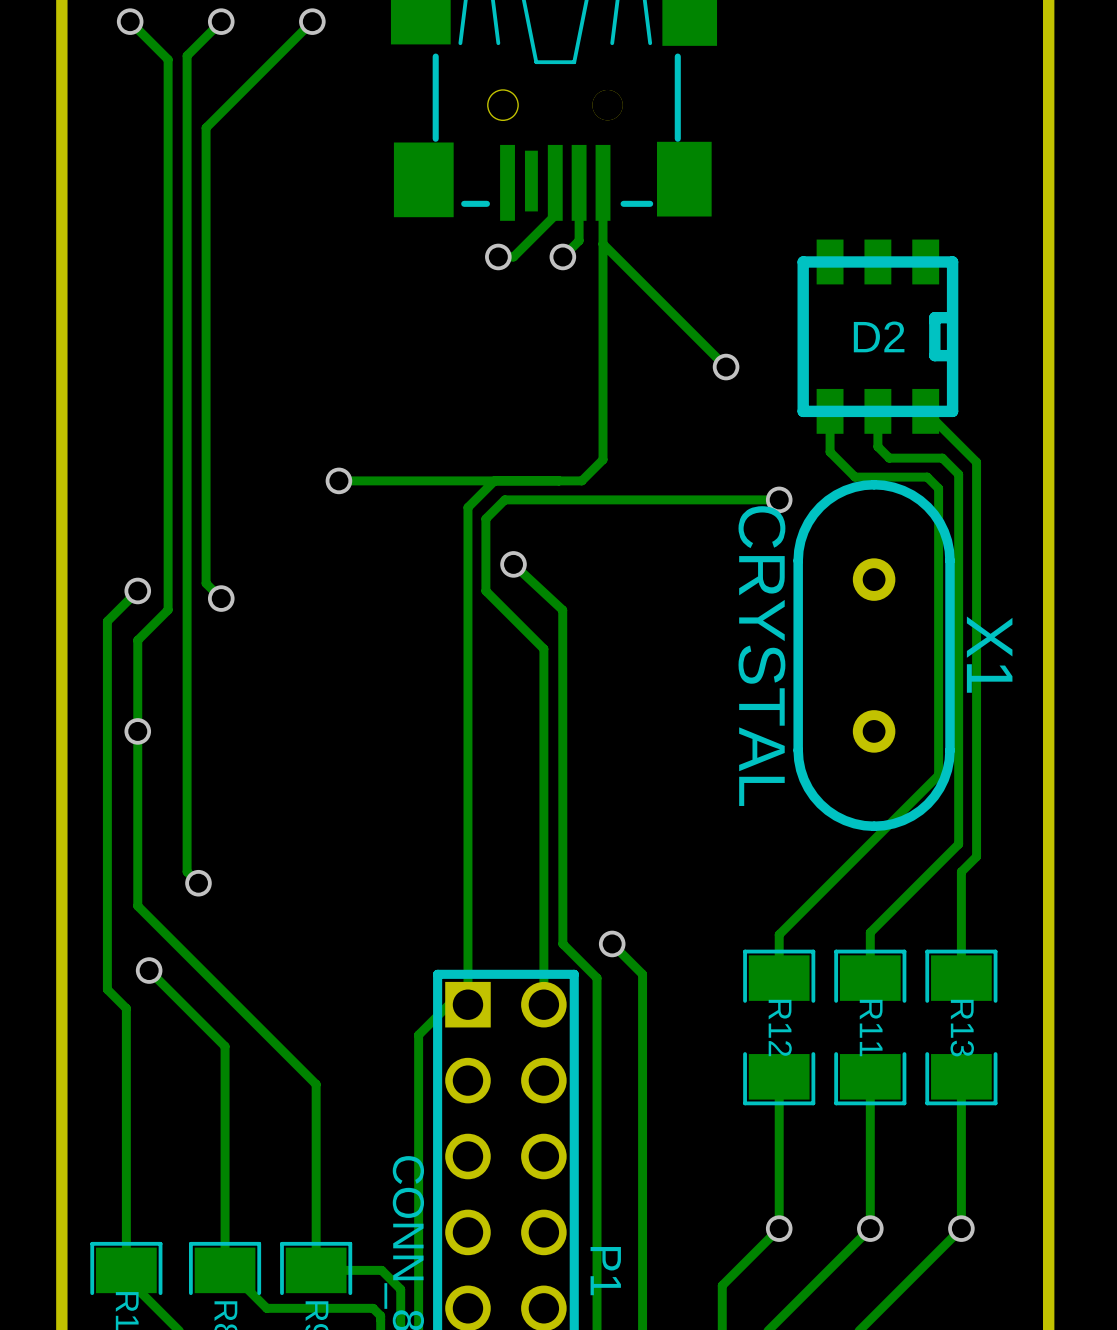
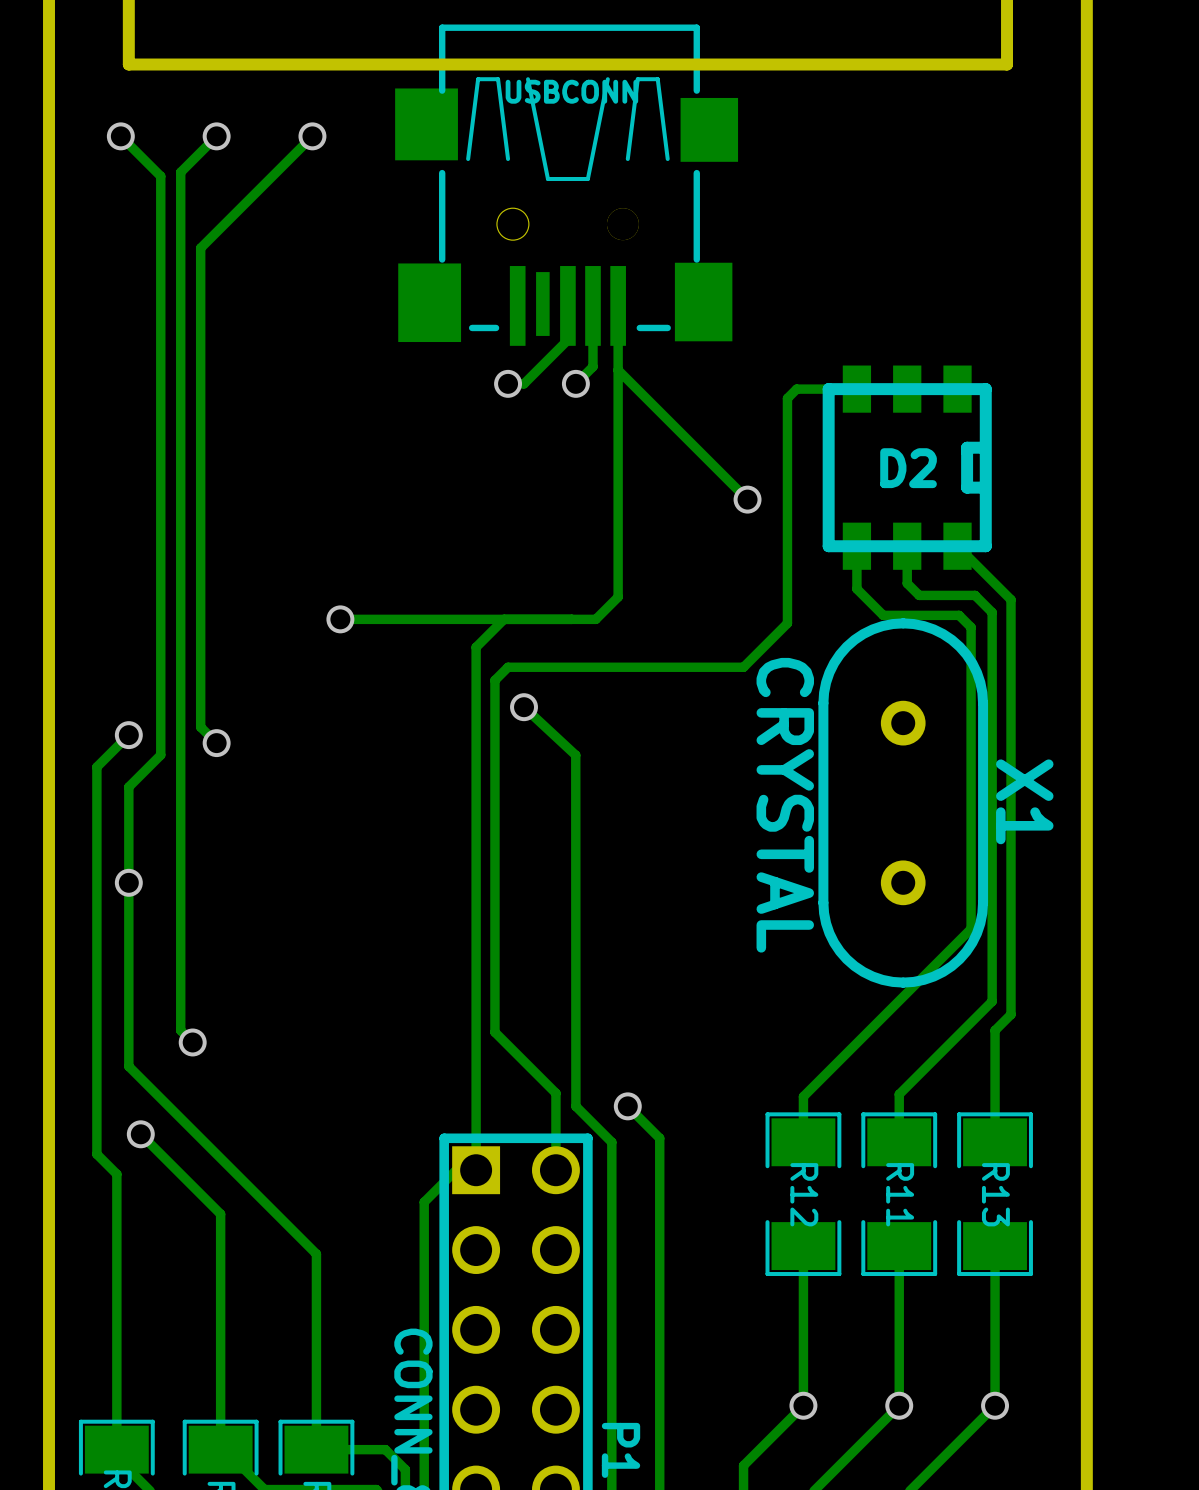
track: (779, 499) (504, 499) (485, 518) (485, 538) -> (856, 389) (796, 389) (787, 398) (787, 623) (743, 667) (508, 667) (494, 680)
via: (779, 499) -> none
track: (485, 590) (543, 648) (543, 931) -> (494, 735) (494, 1032) (555, 1093)

